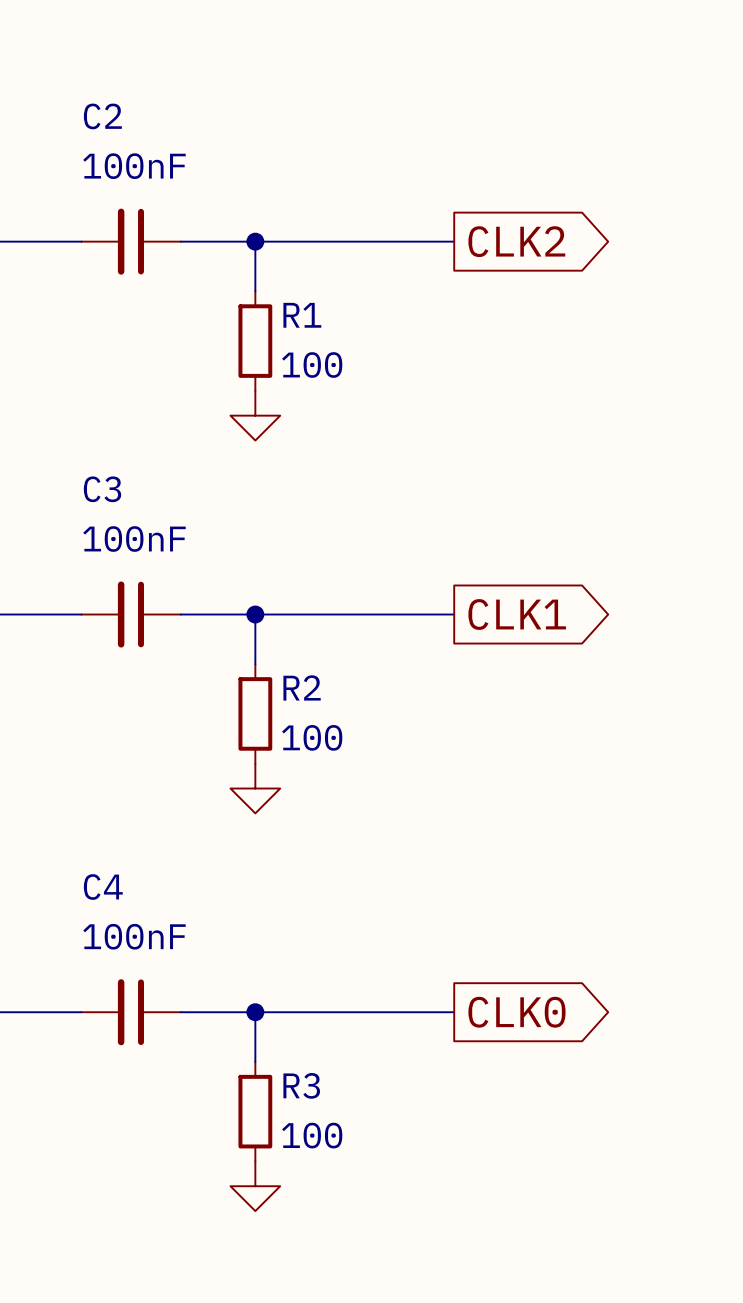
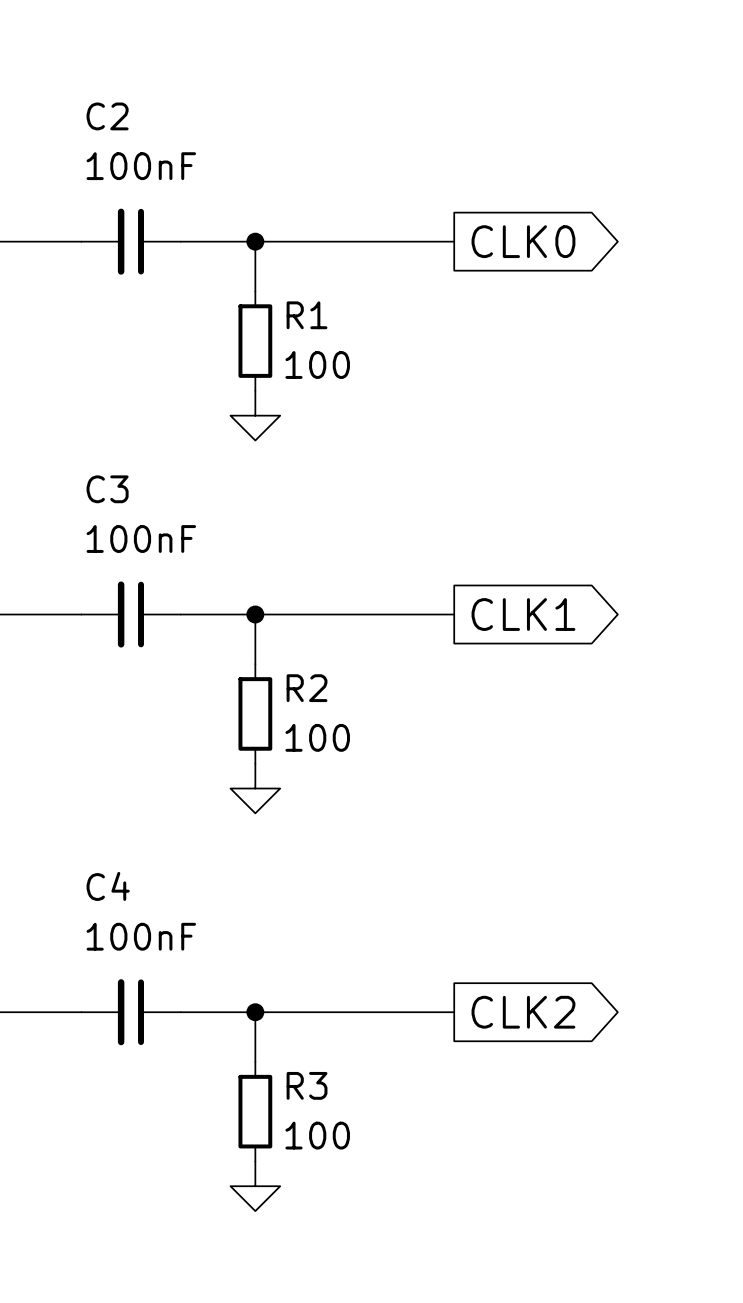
global label: CLK2 (516, 241) -> CLK0 (523, 241)
global label: CLK0 (516, 1012) -> CLK2 (523, 1012)

